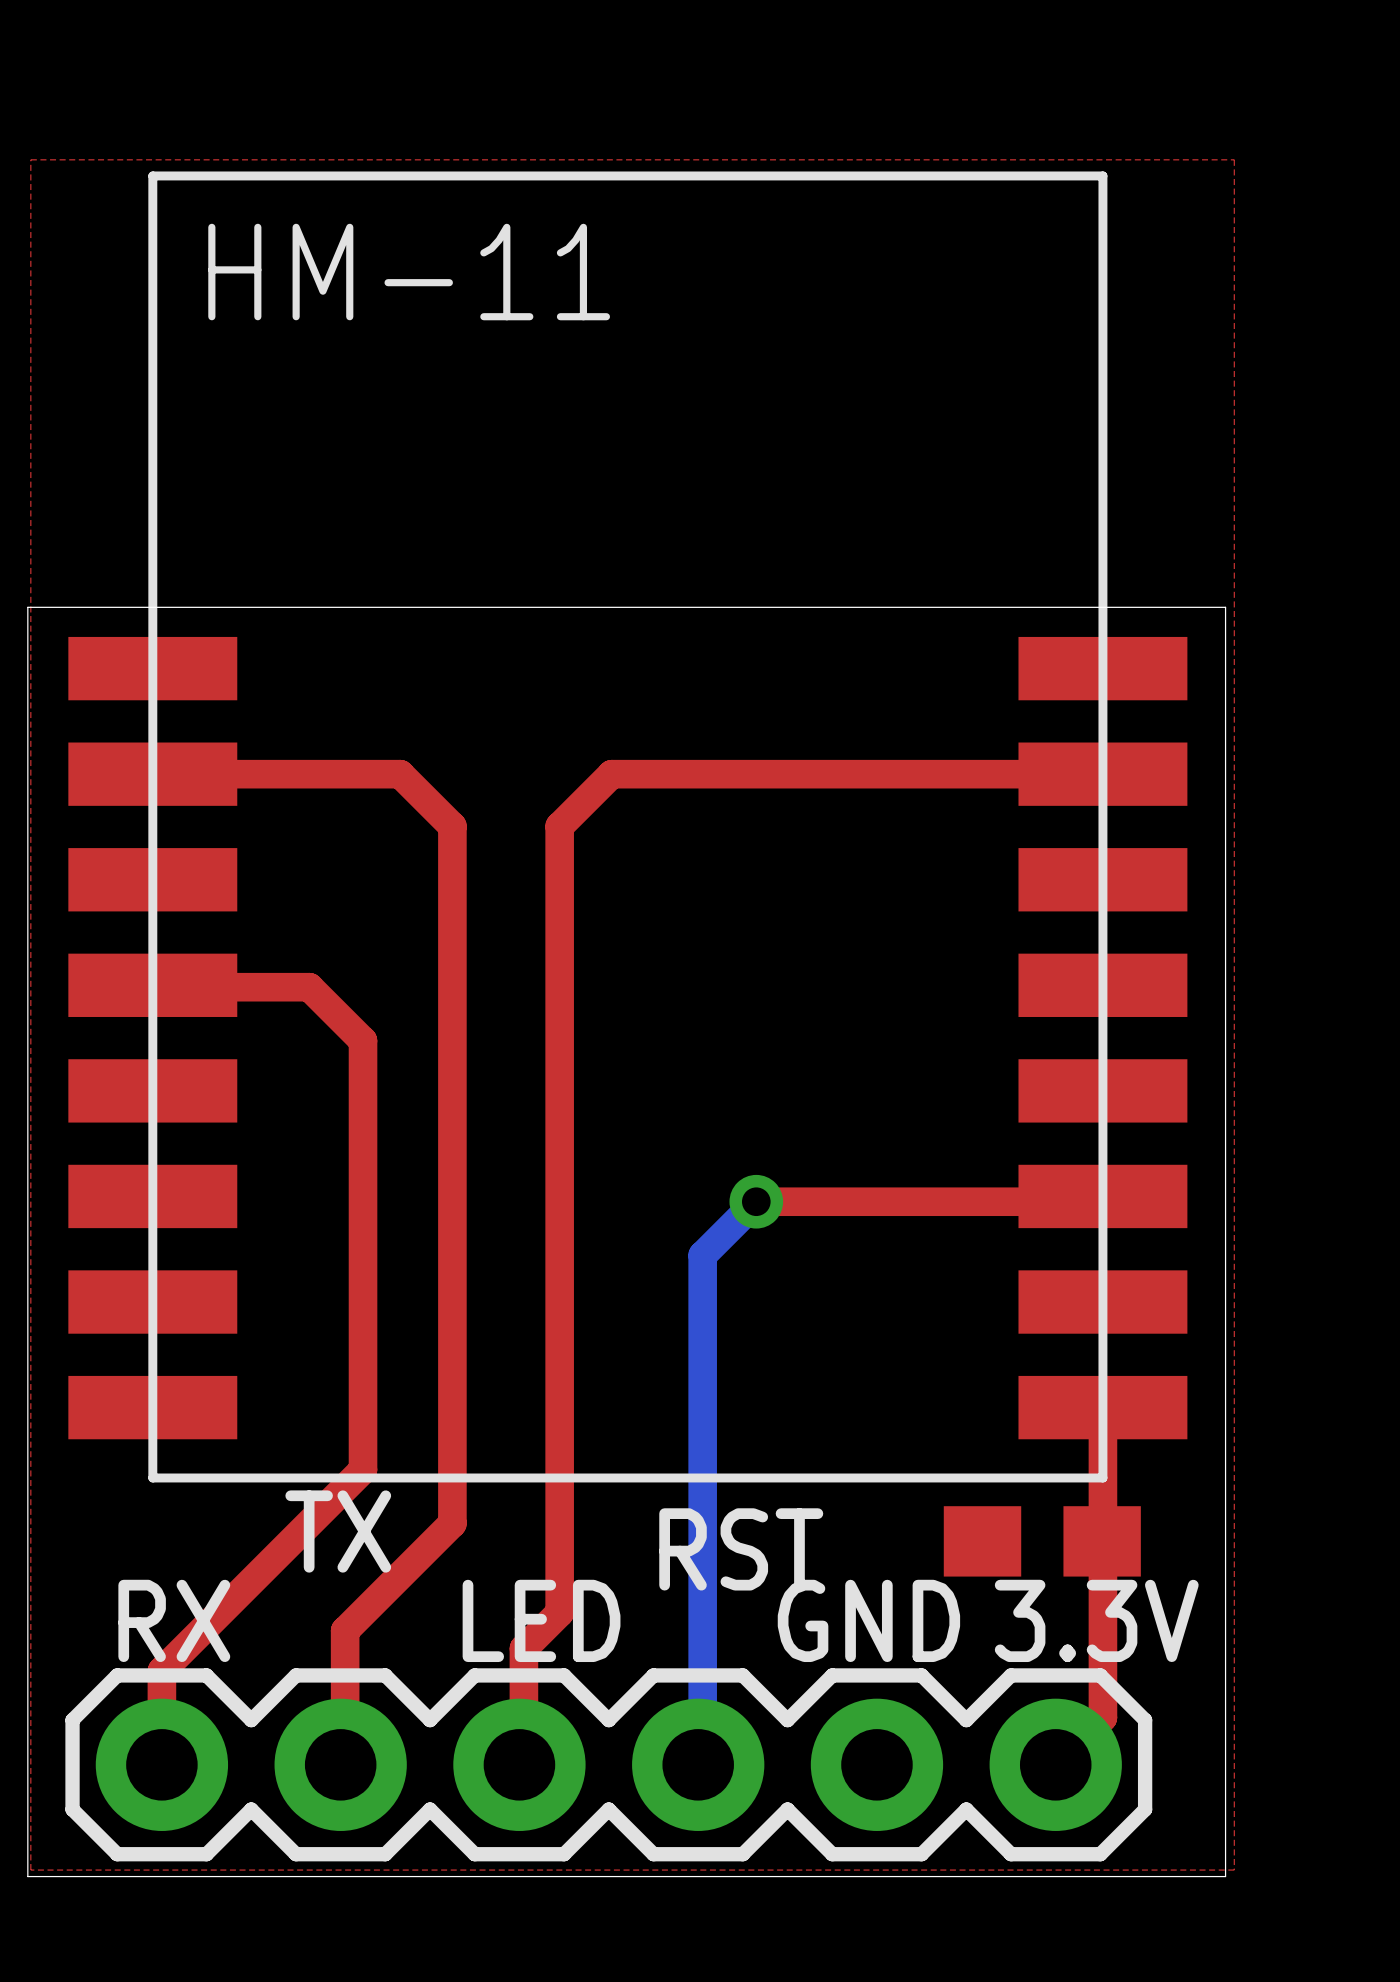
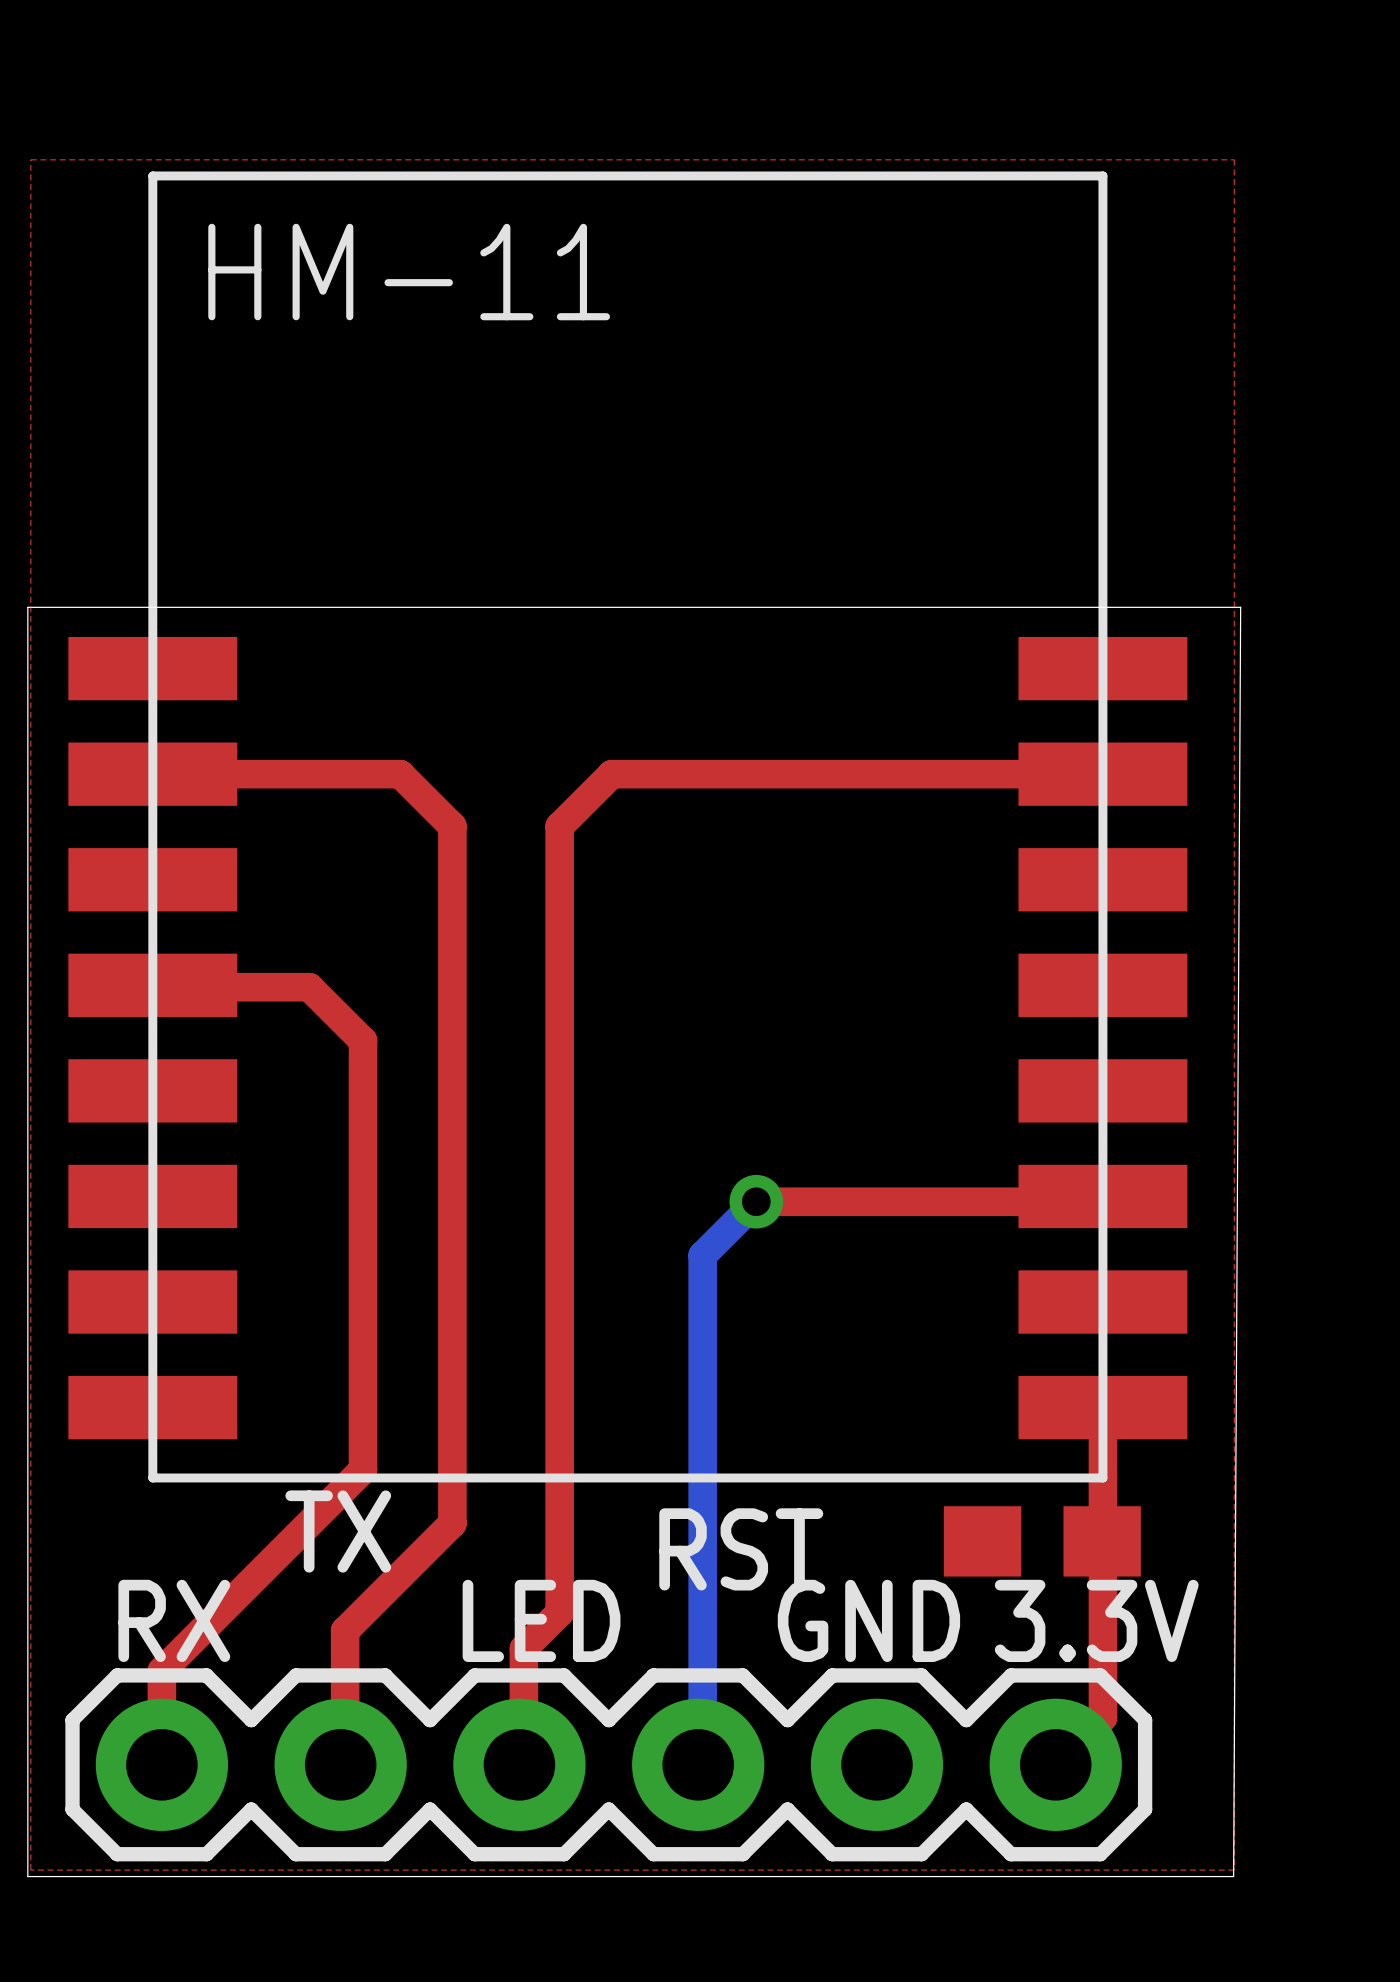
board edge: (1225, 607) (1225, 1876) -> (1225, 607) (1240, 607) (1233, 1876) (1225, 1876)

